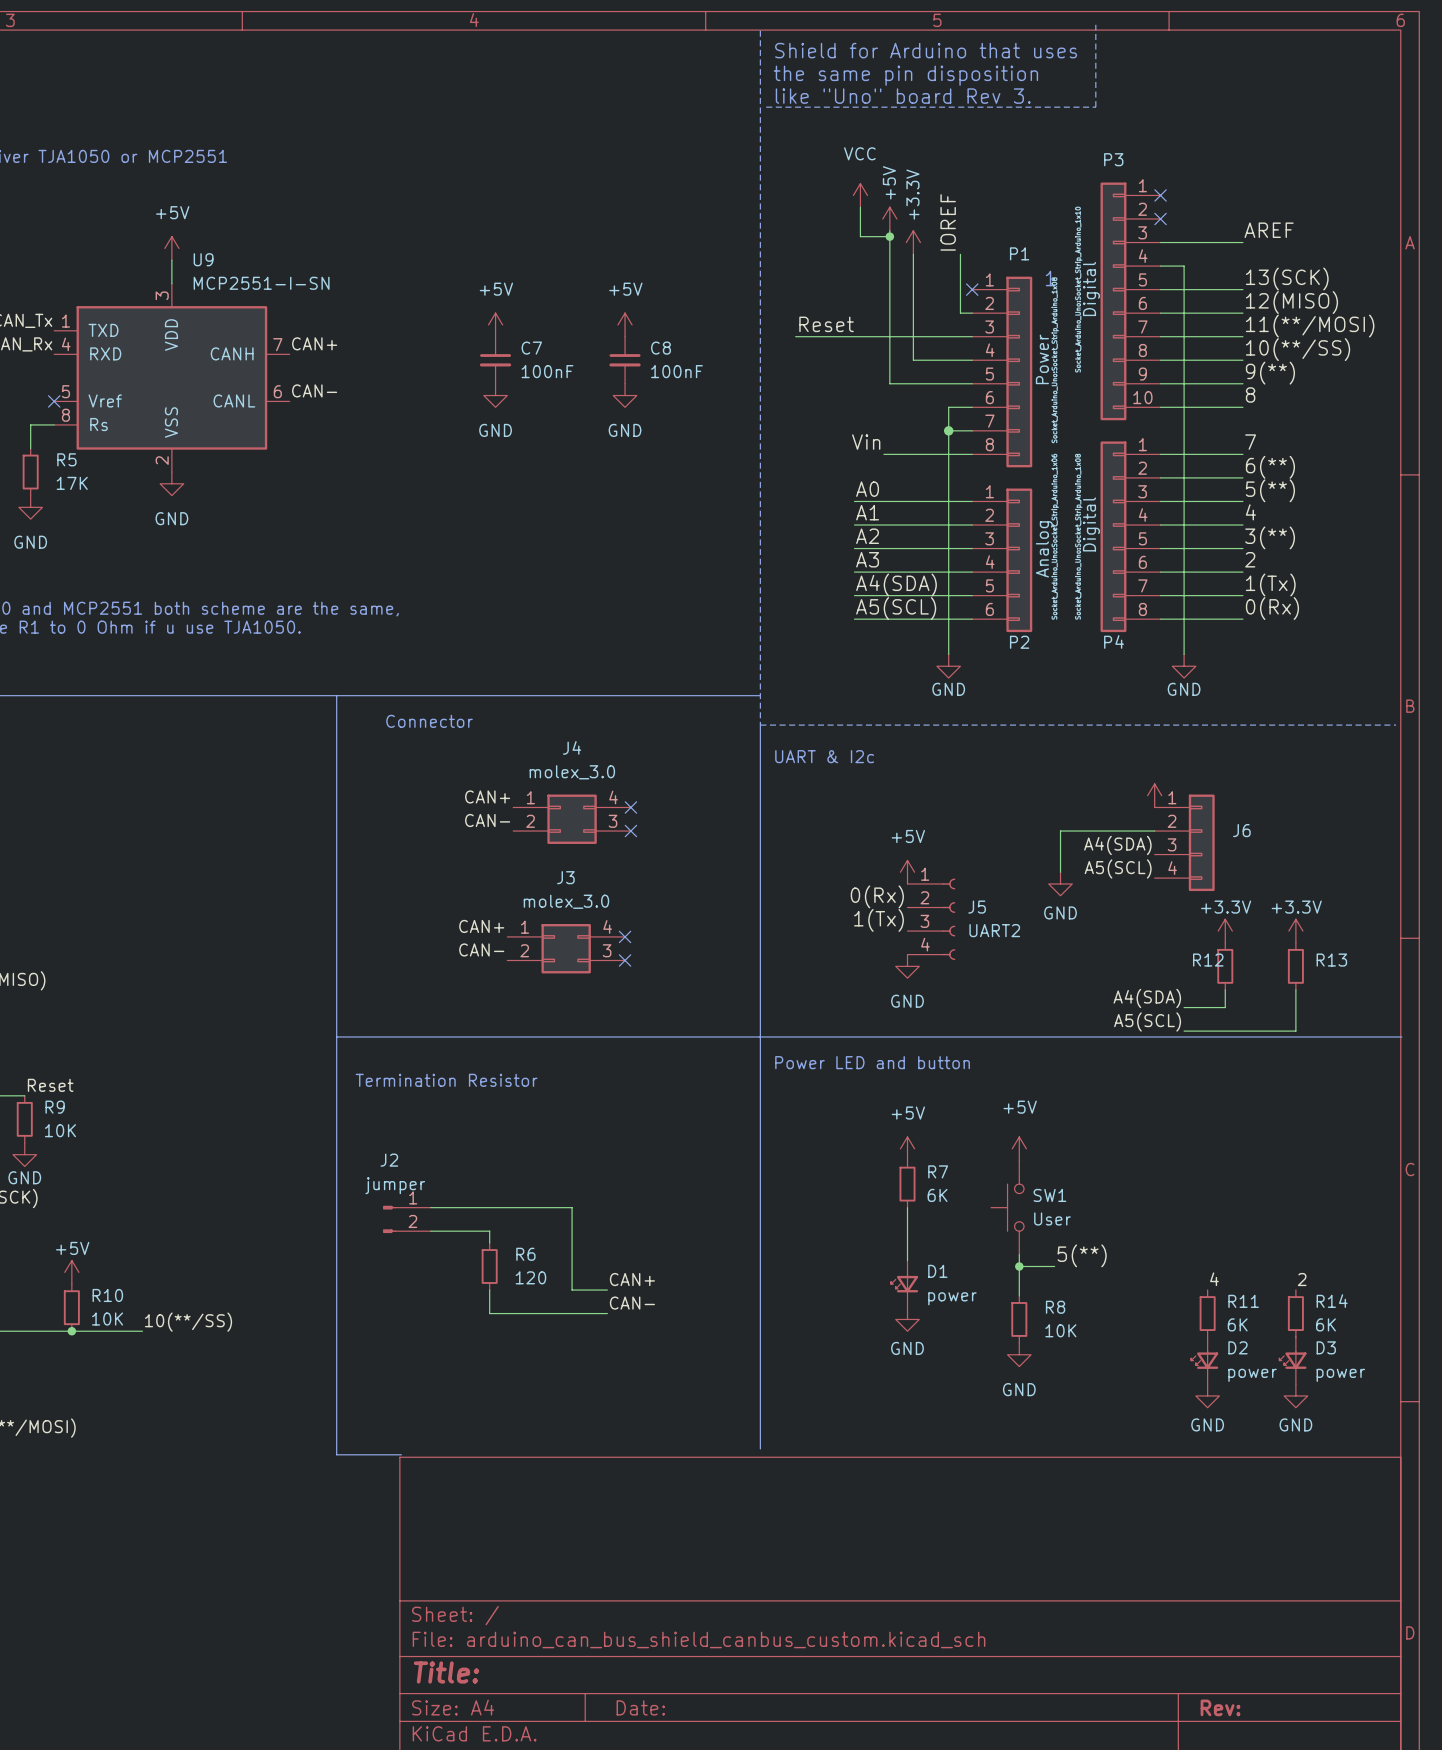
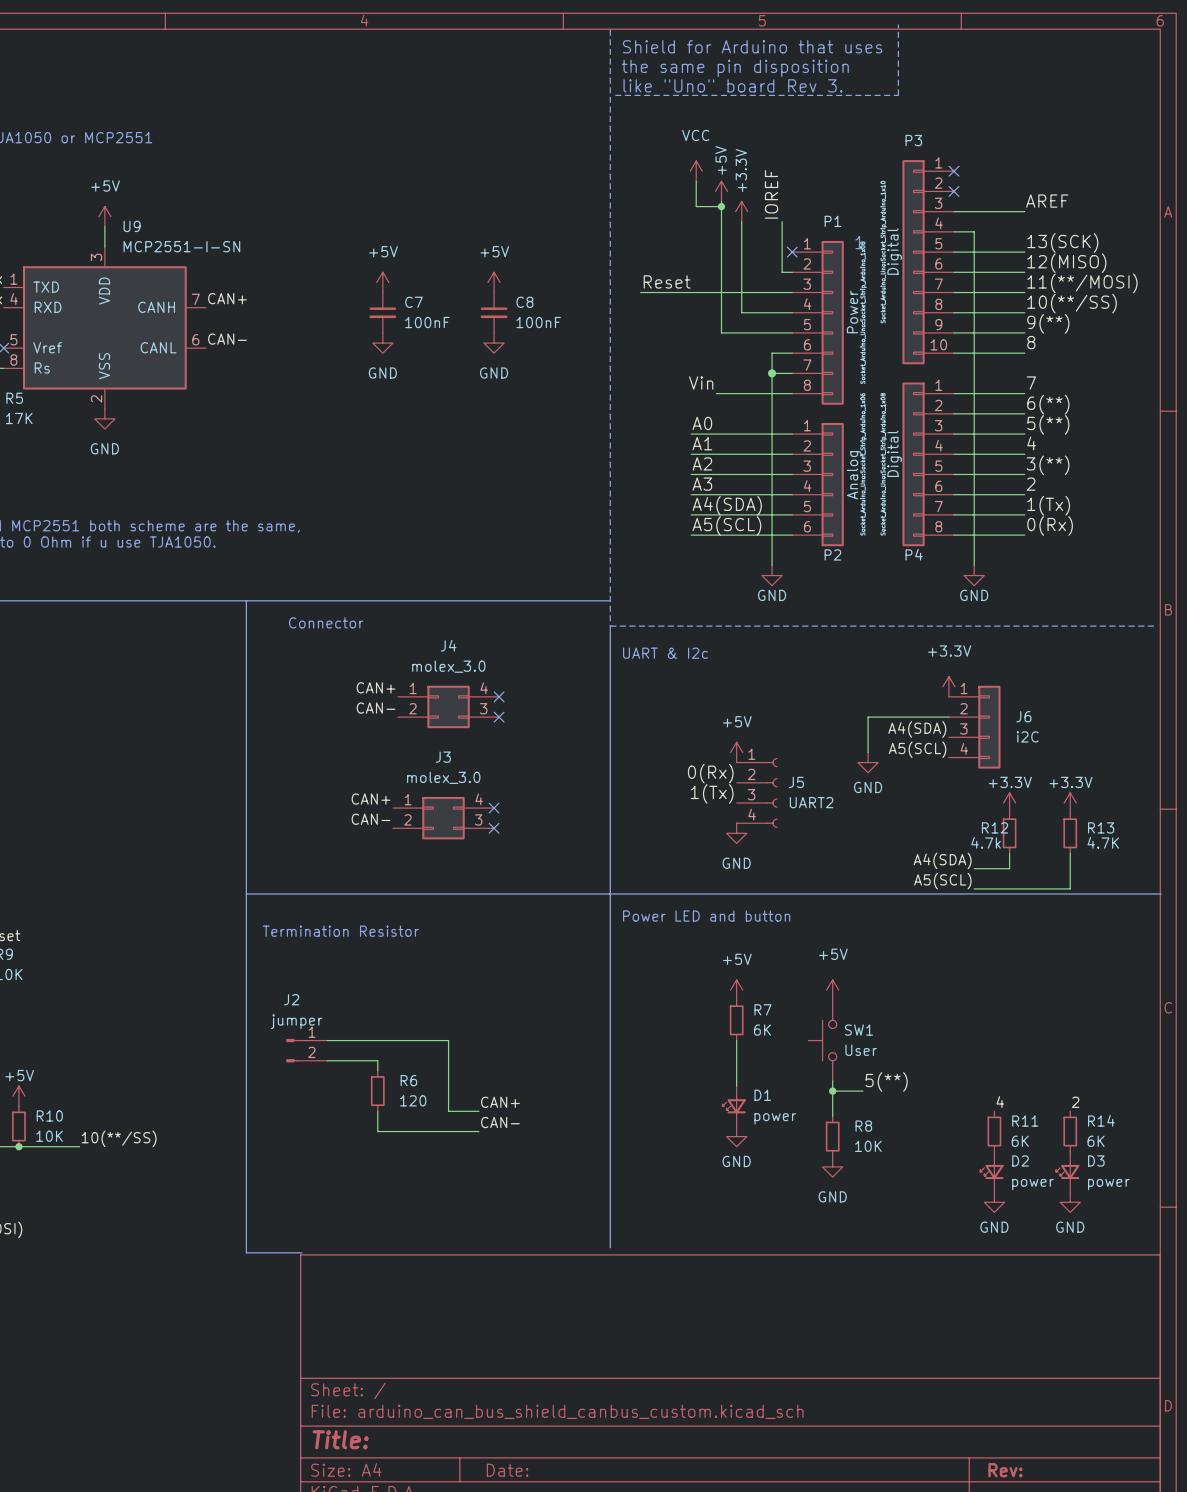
power symbol text: none -> +3.3V (949, 651)
J6 value: none -> i2C (1027, 736)
R12 value: none -> 4.7k (986, 842)
R13 value: none -> 4.7K (1103, 842)

